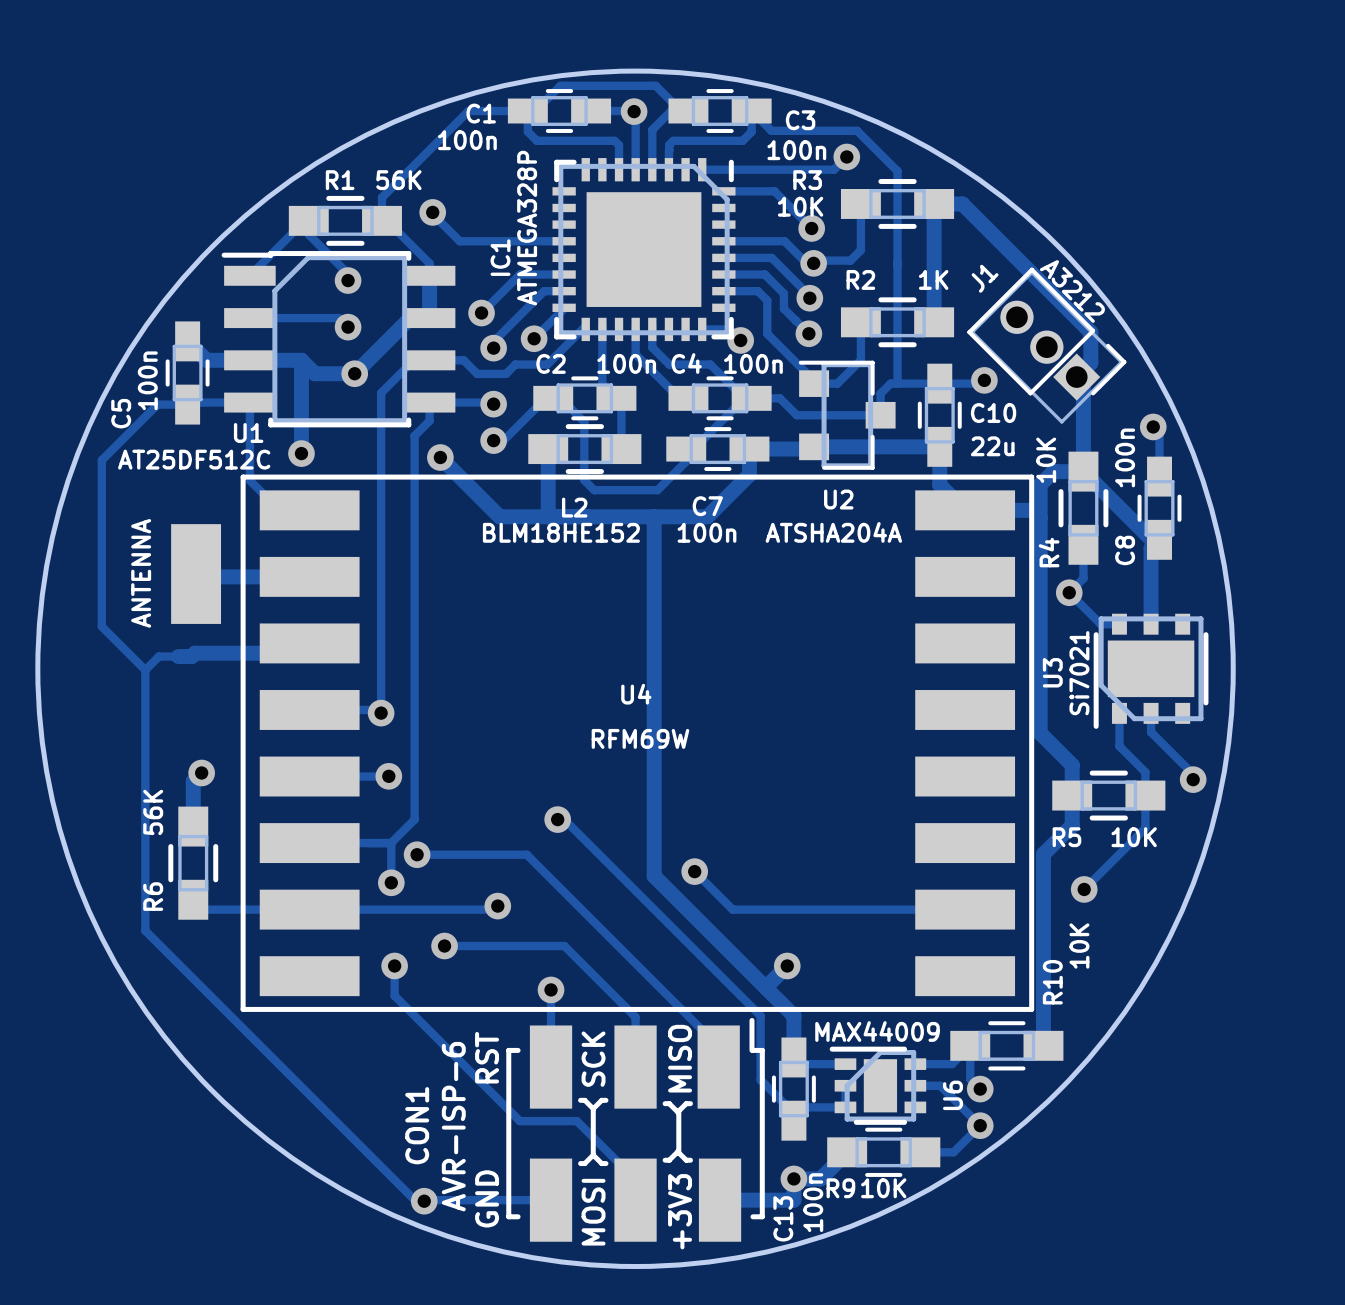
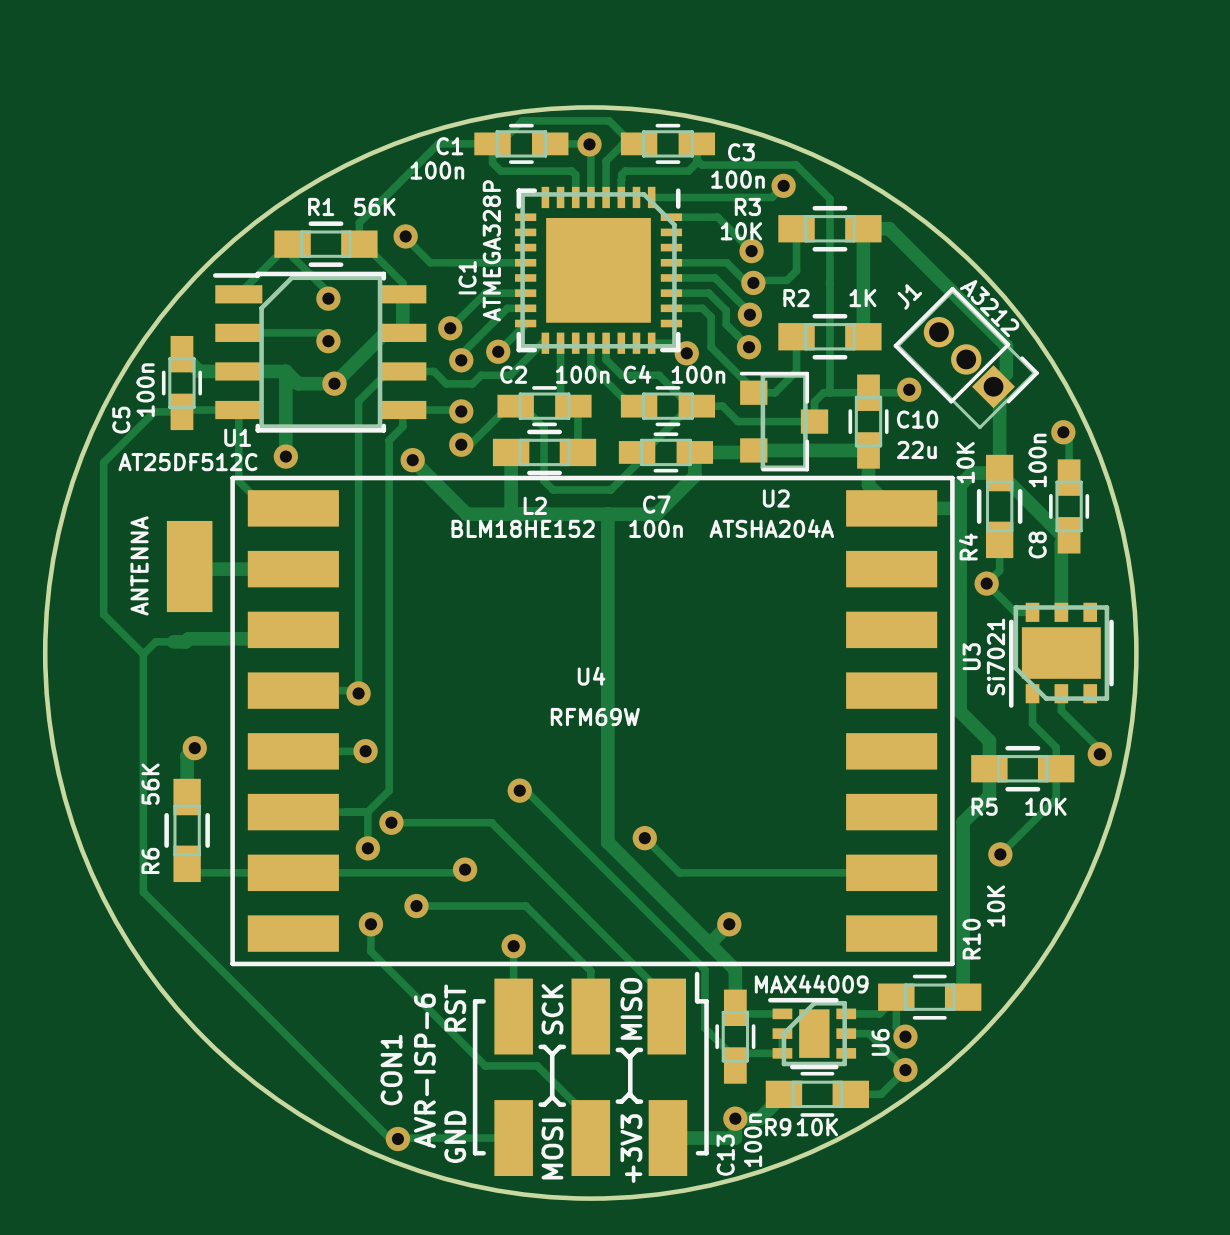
track: (751, 111) (771, 130) (857, 130) (860, 134) -> (696, 159) (701, 165) (796, 165)

